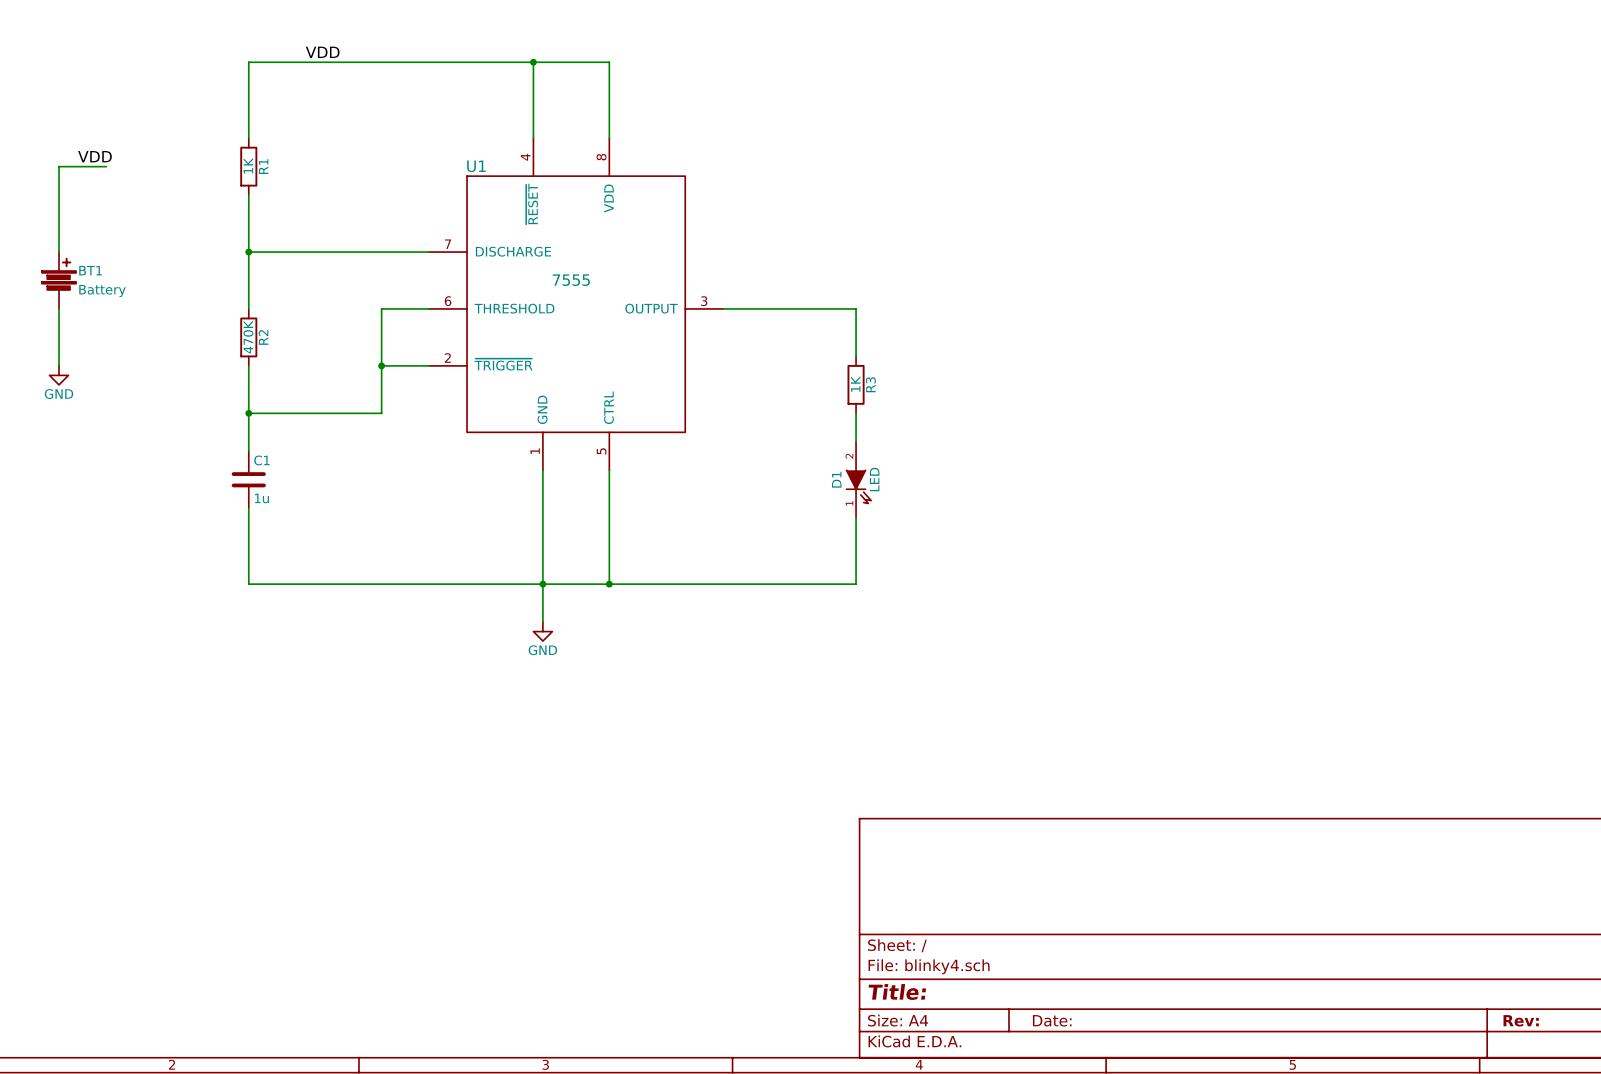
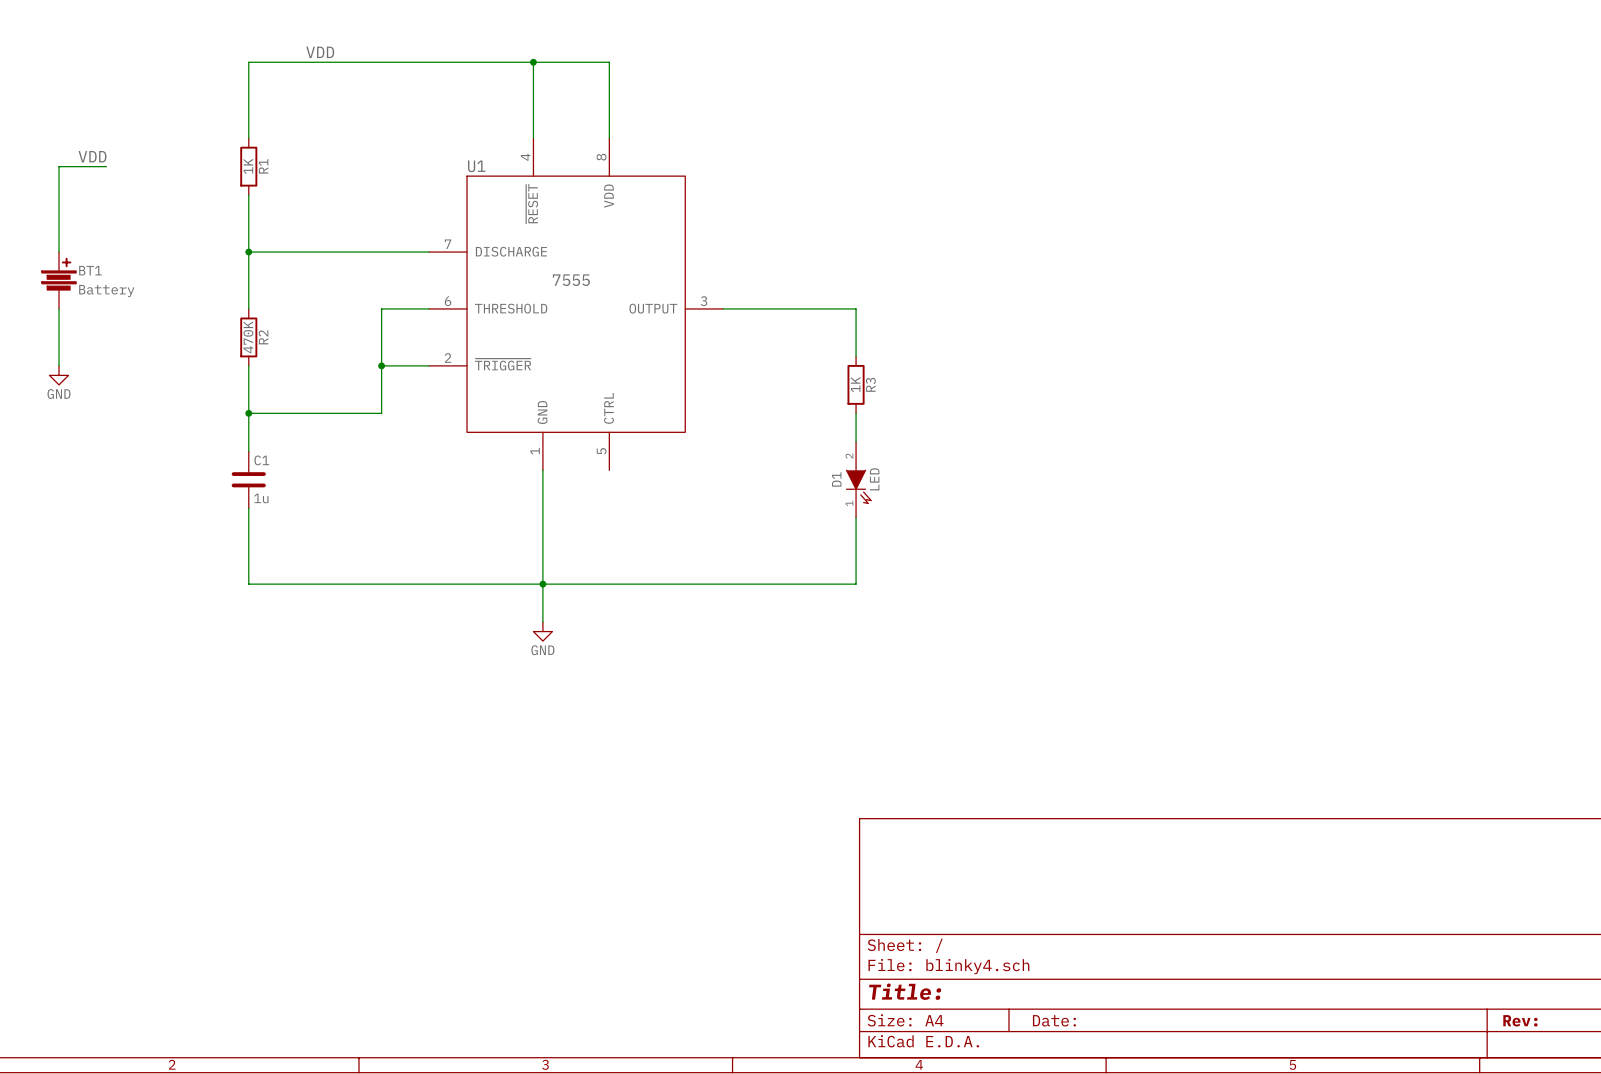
wire: (609, 470) (609, 584) -> none
junction: (609, 584) -> none

